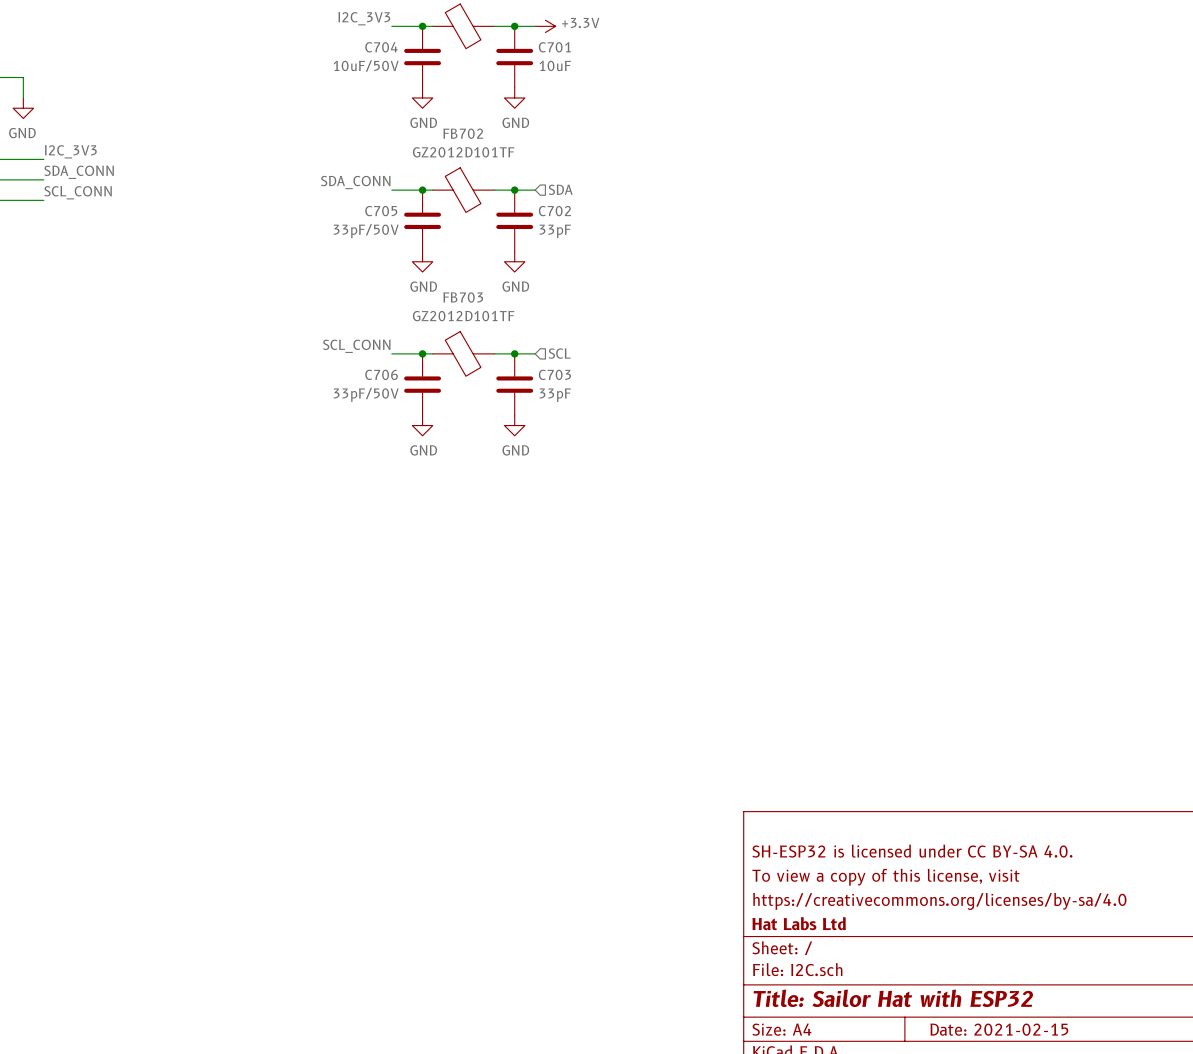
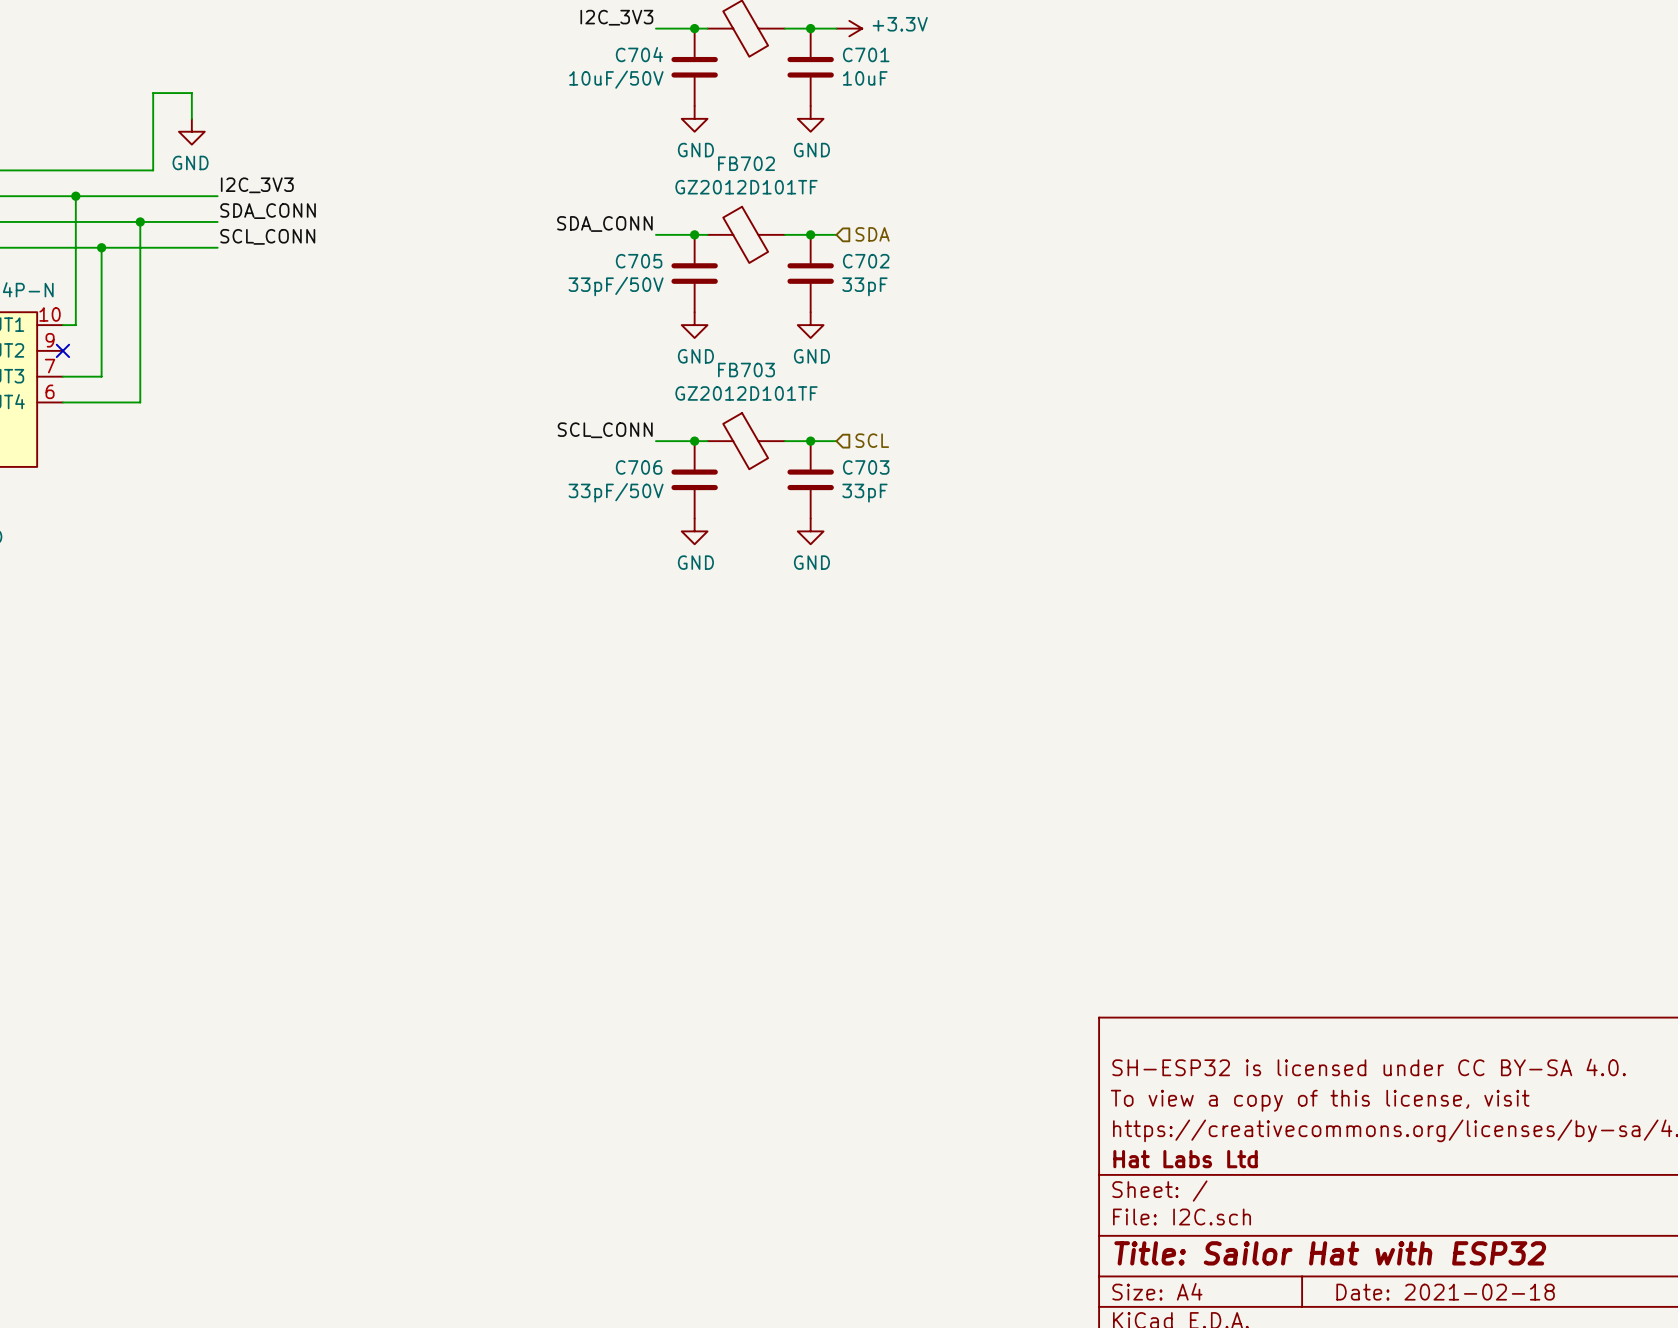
title block: Date: 2021-02-15 (999, 1029) -> Date: 2021-02-18 (1445, 1292)

